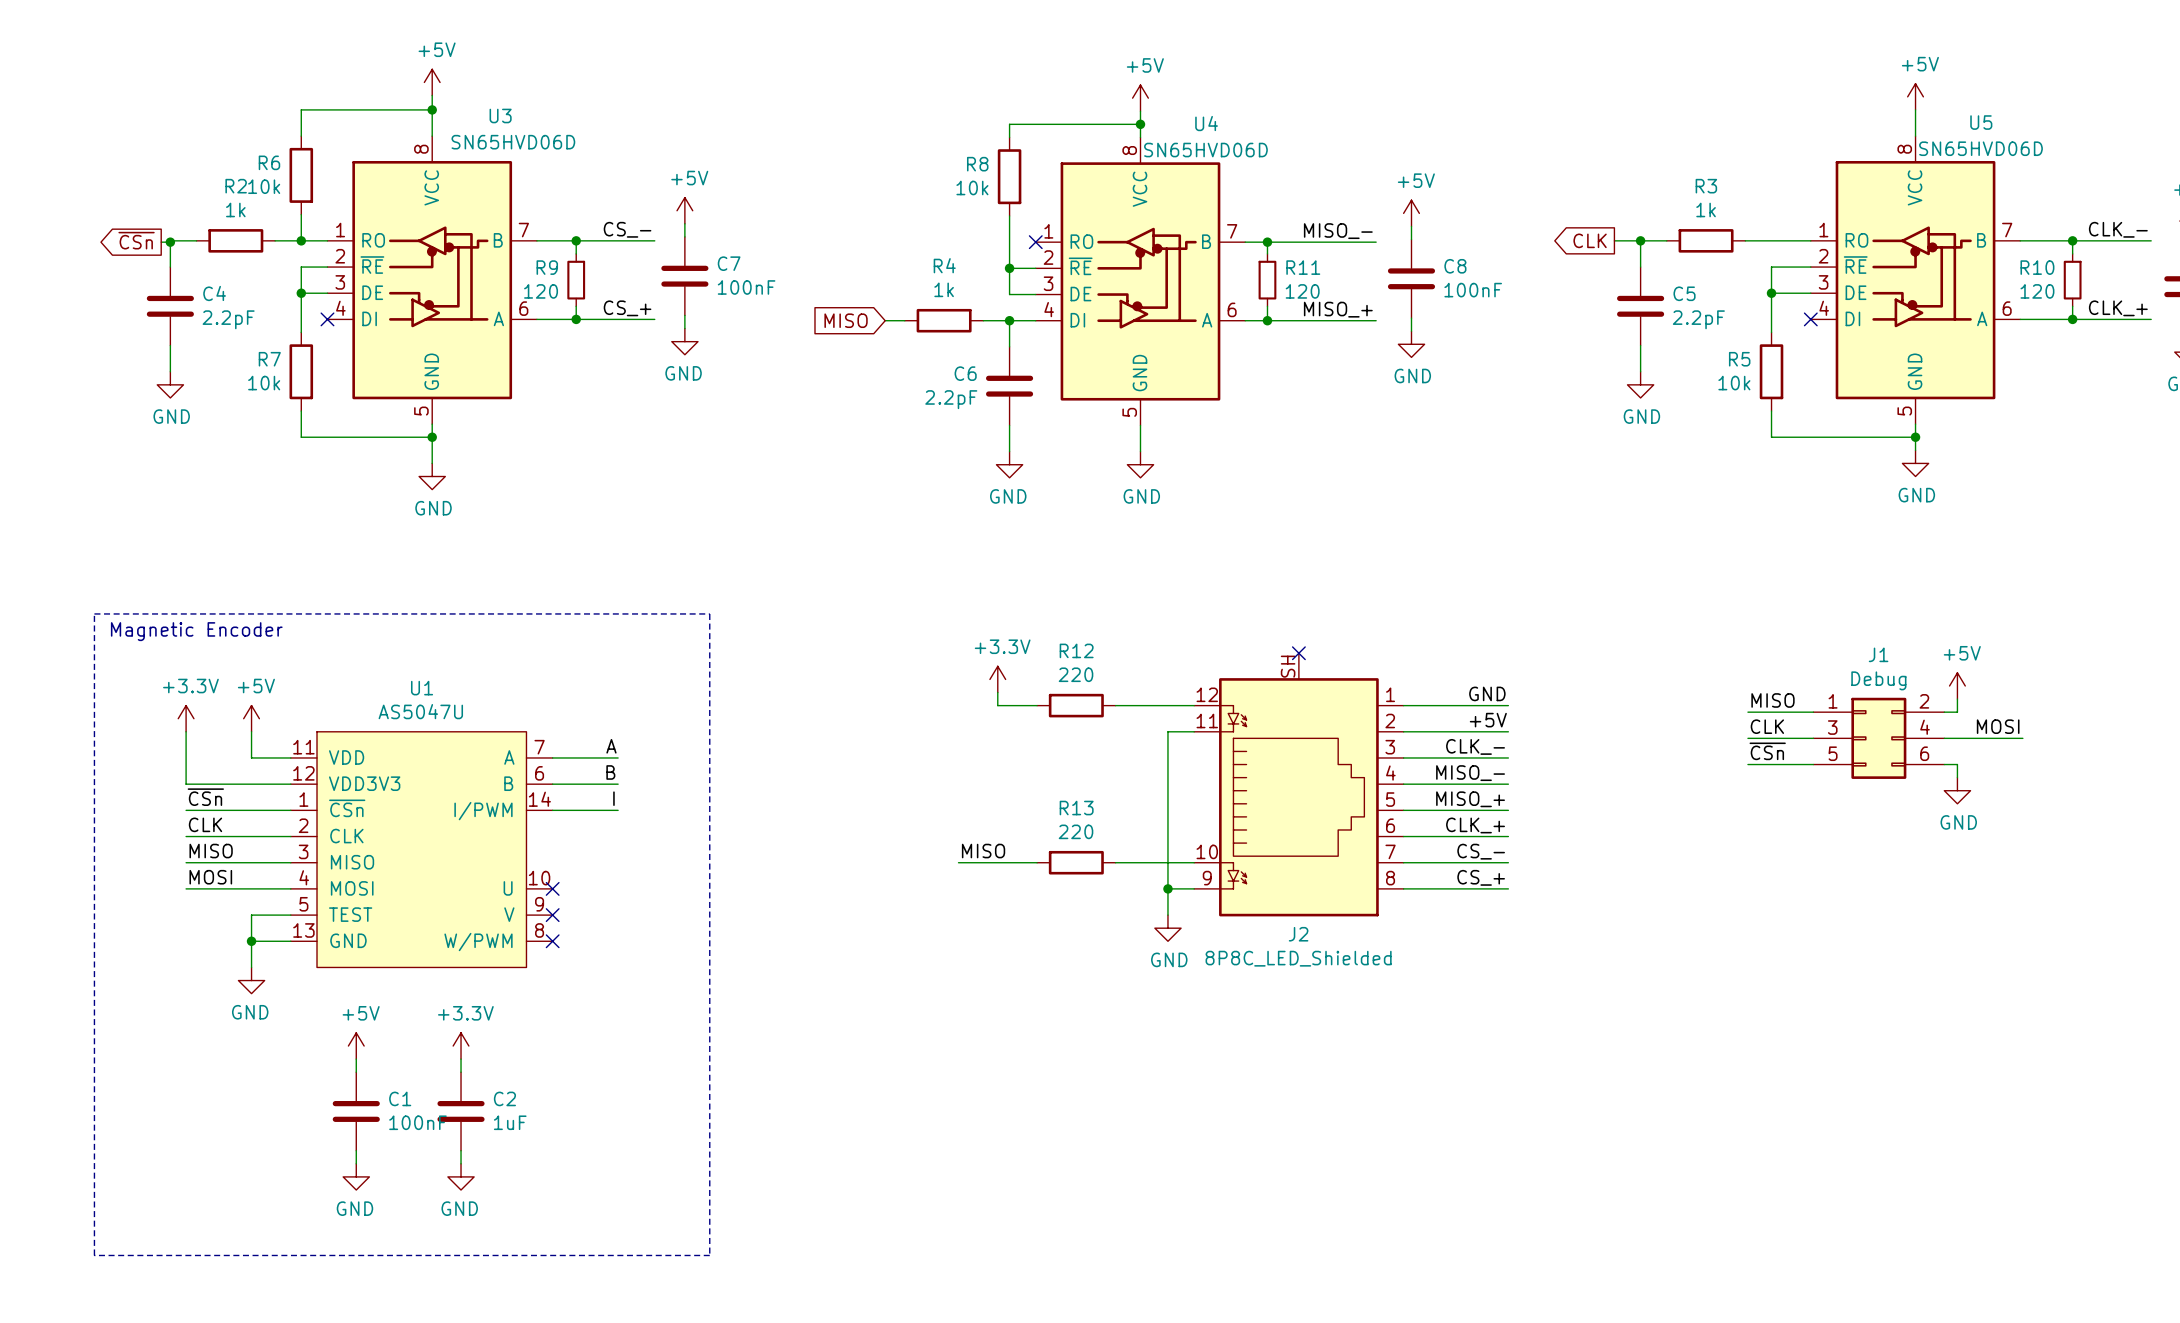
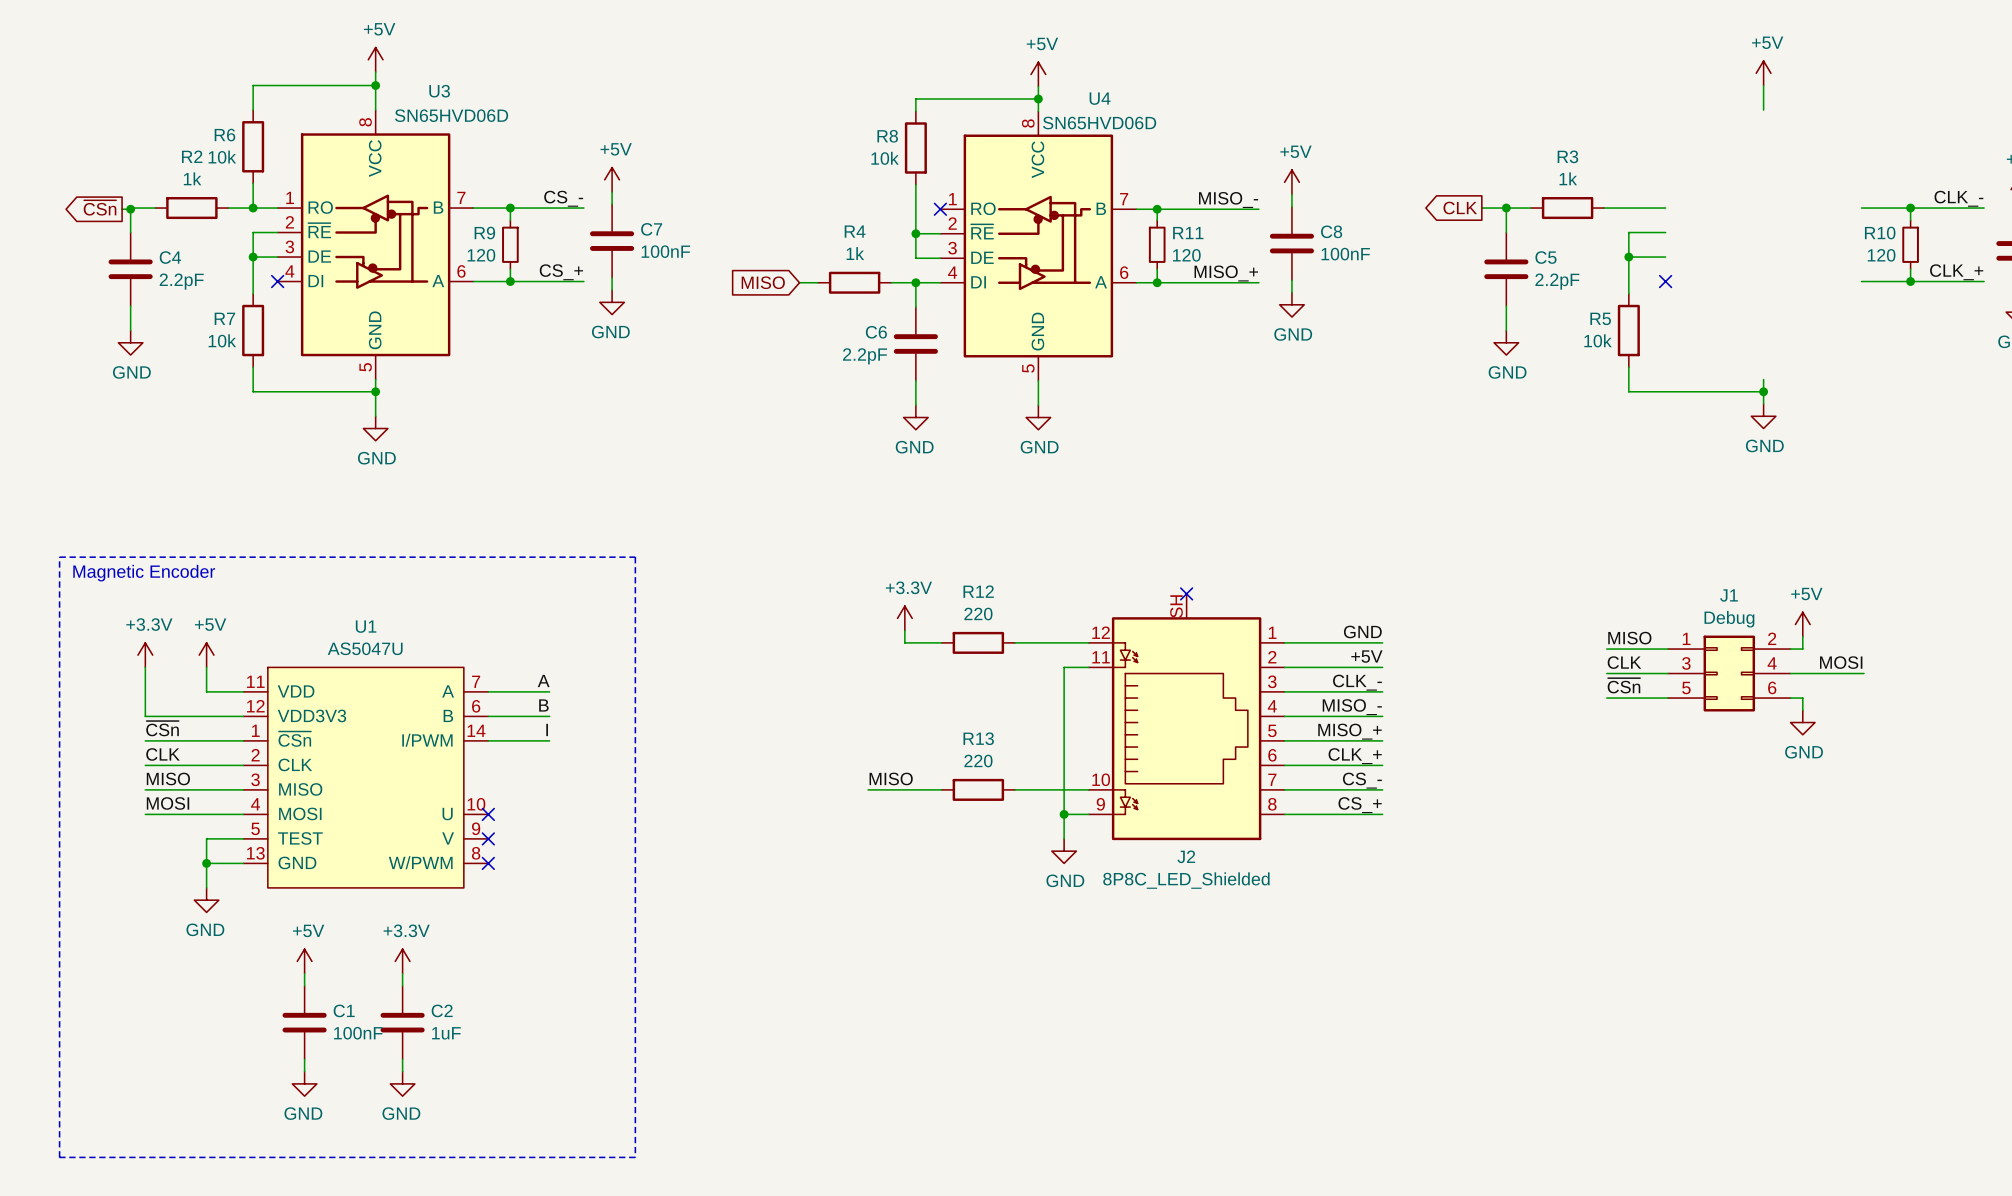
U5: SN65HVD06D (1915, 280) -> none

